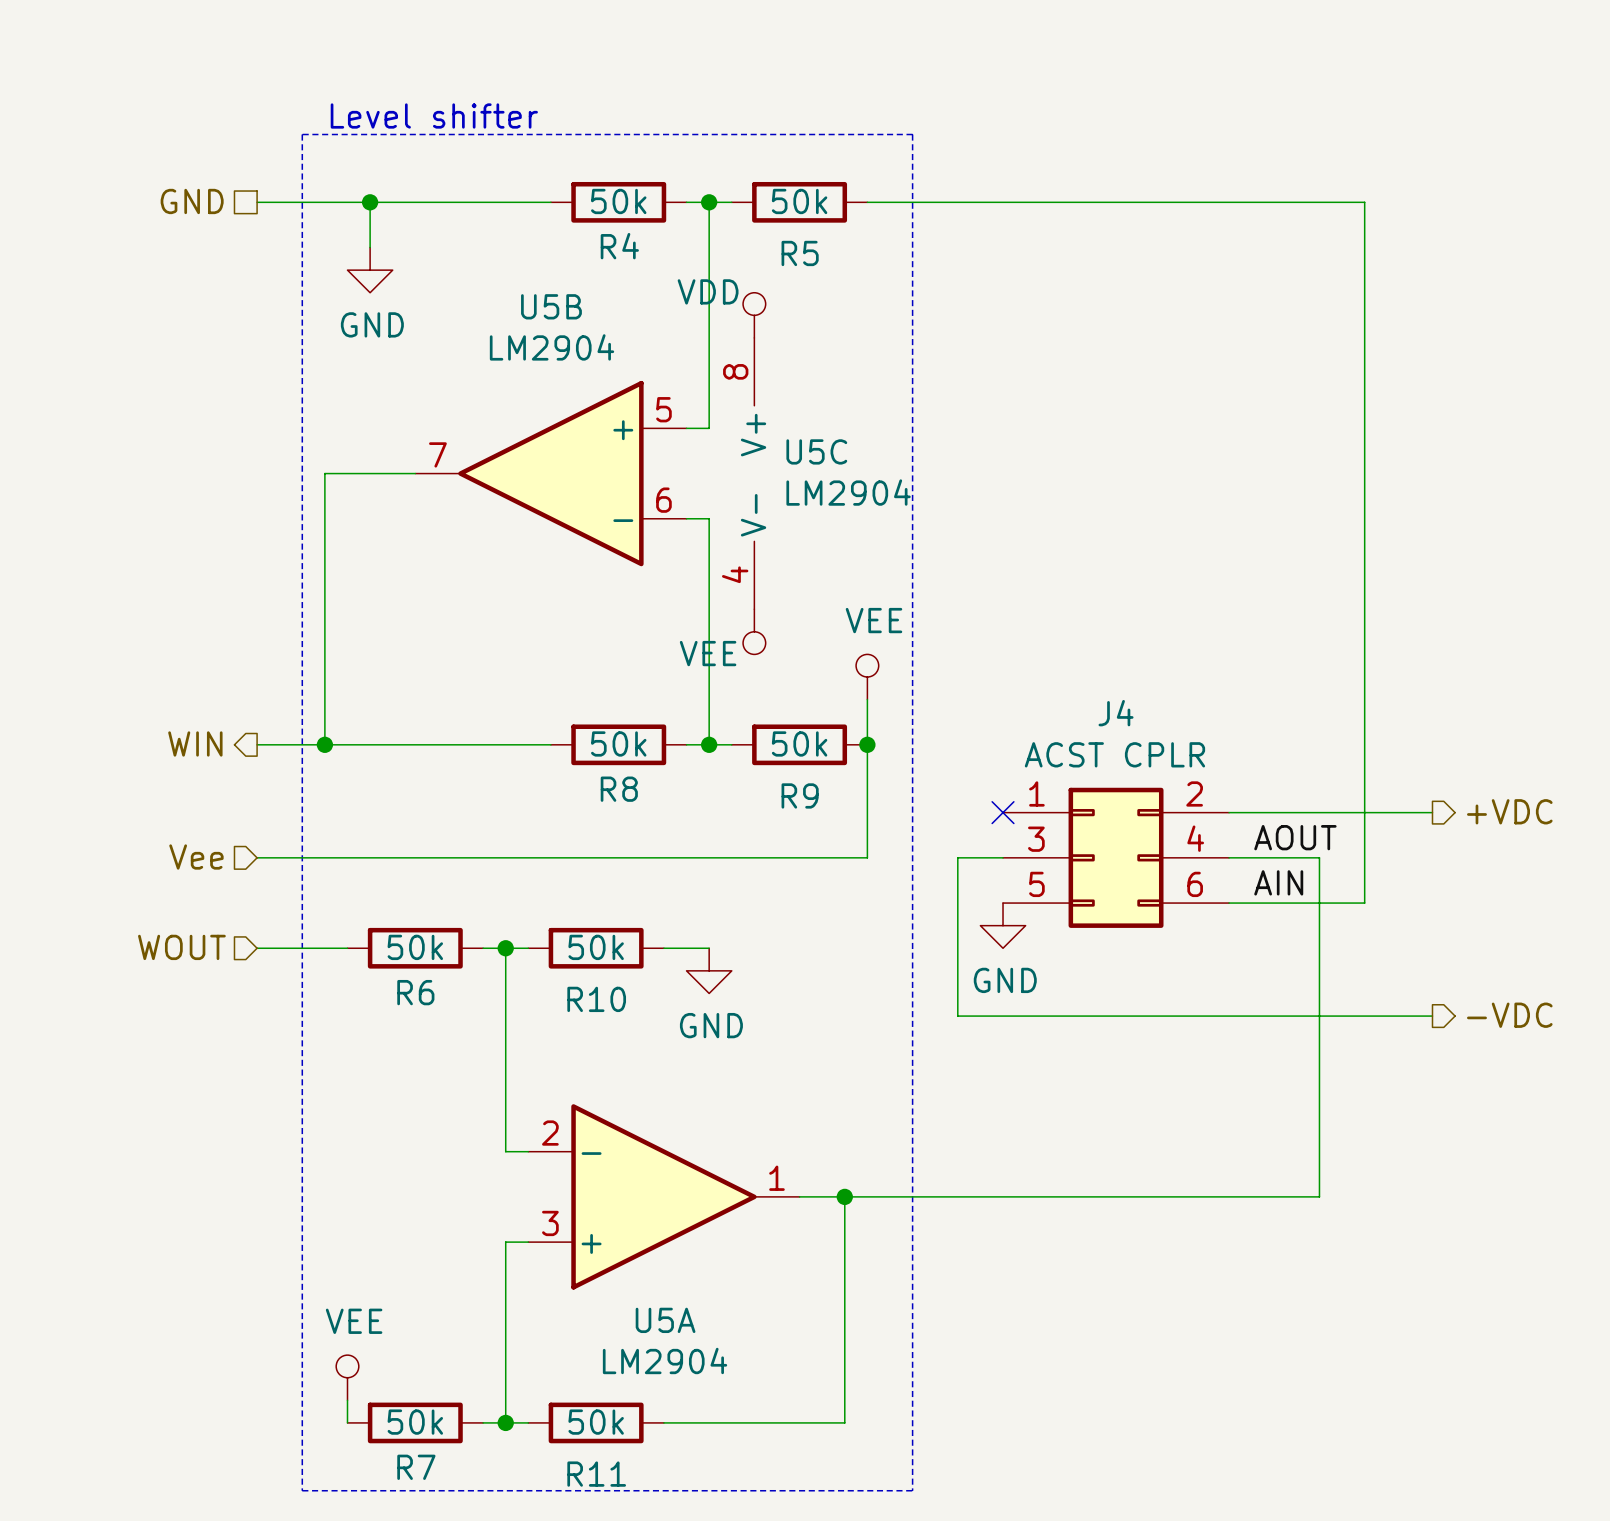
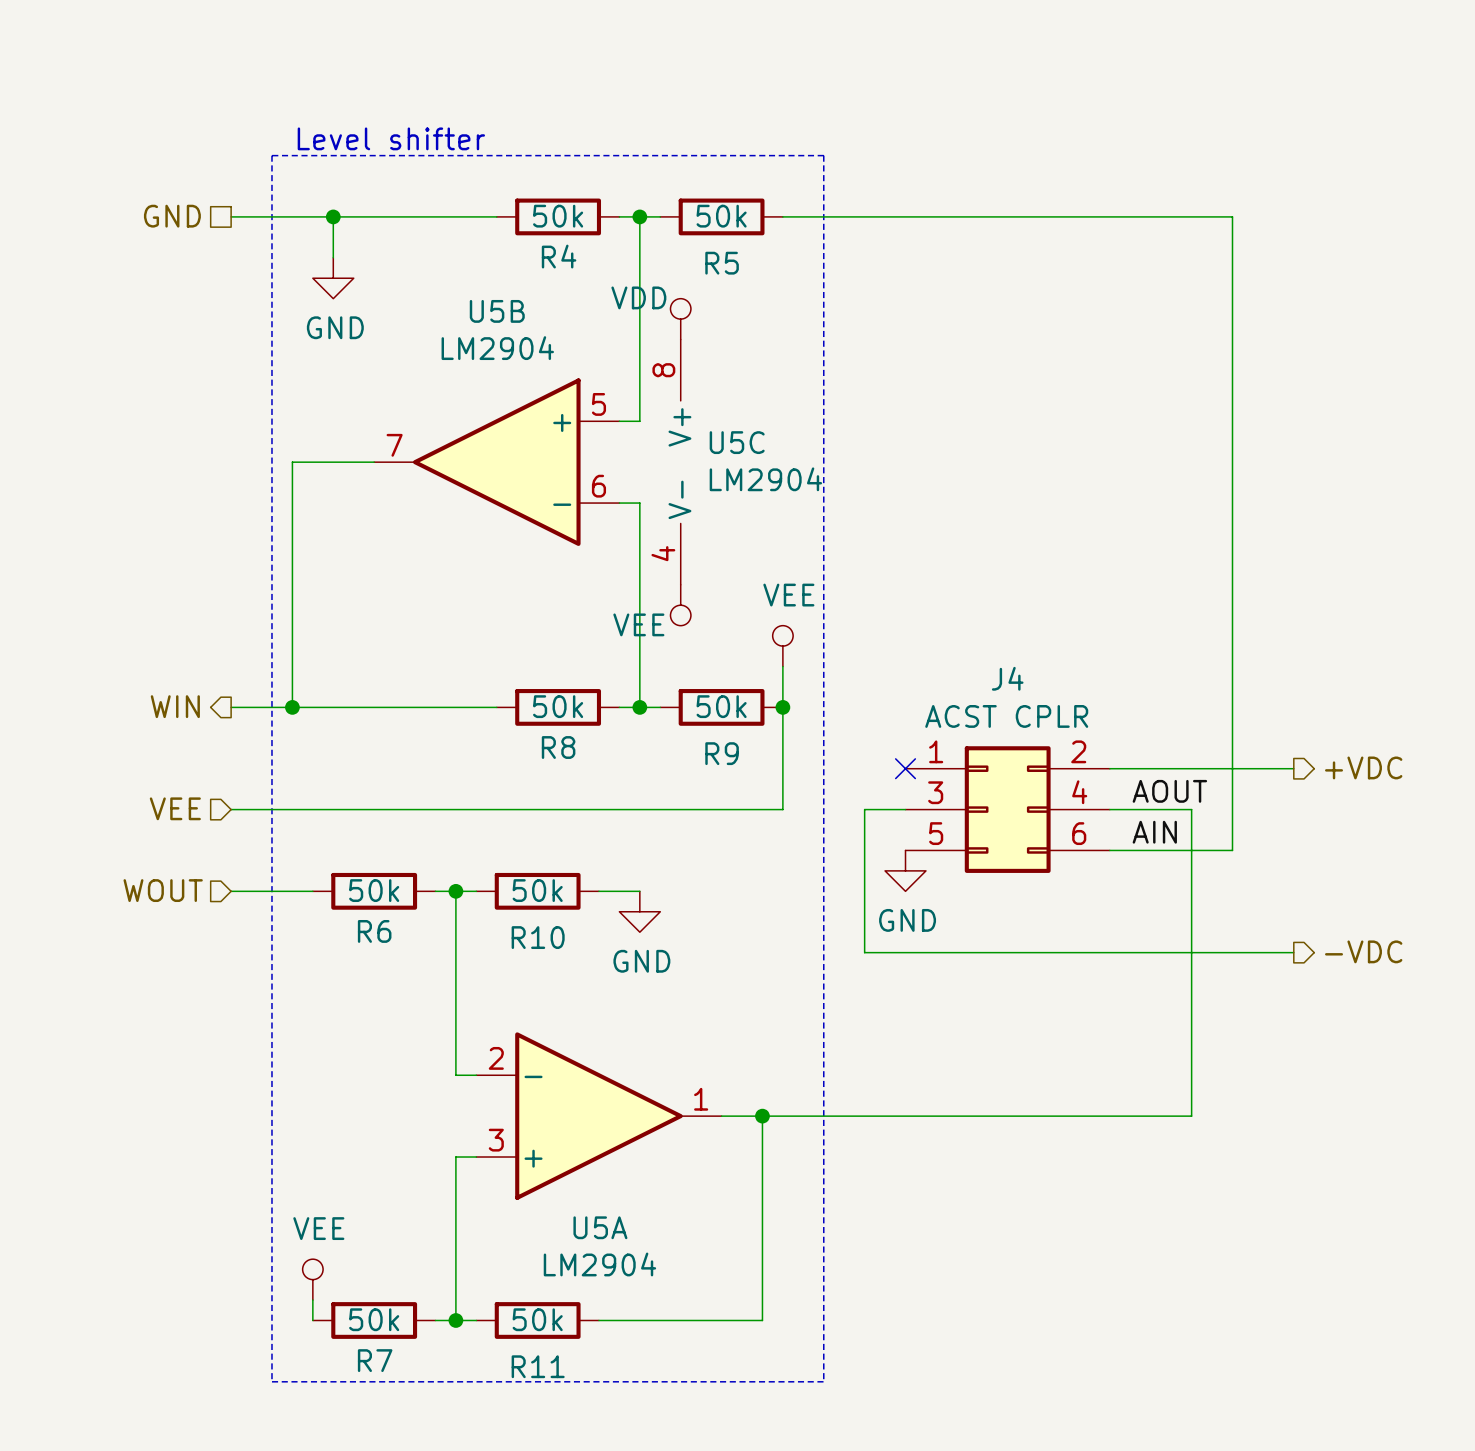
hierarchical label: Vee (196, 856) -> VEE (175, 808)

